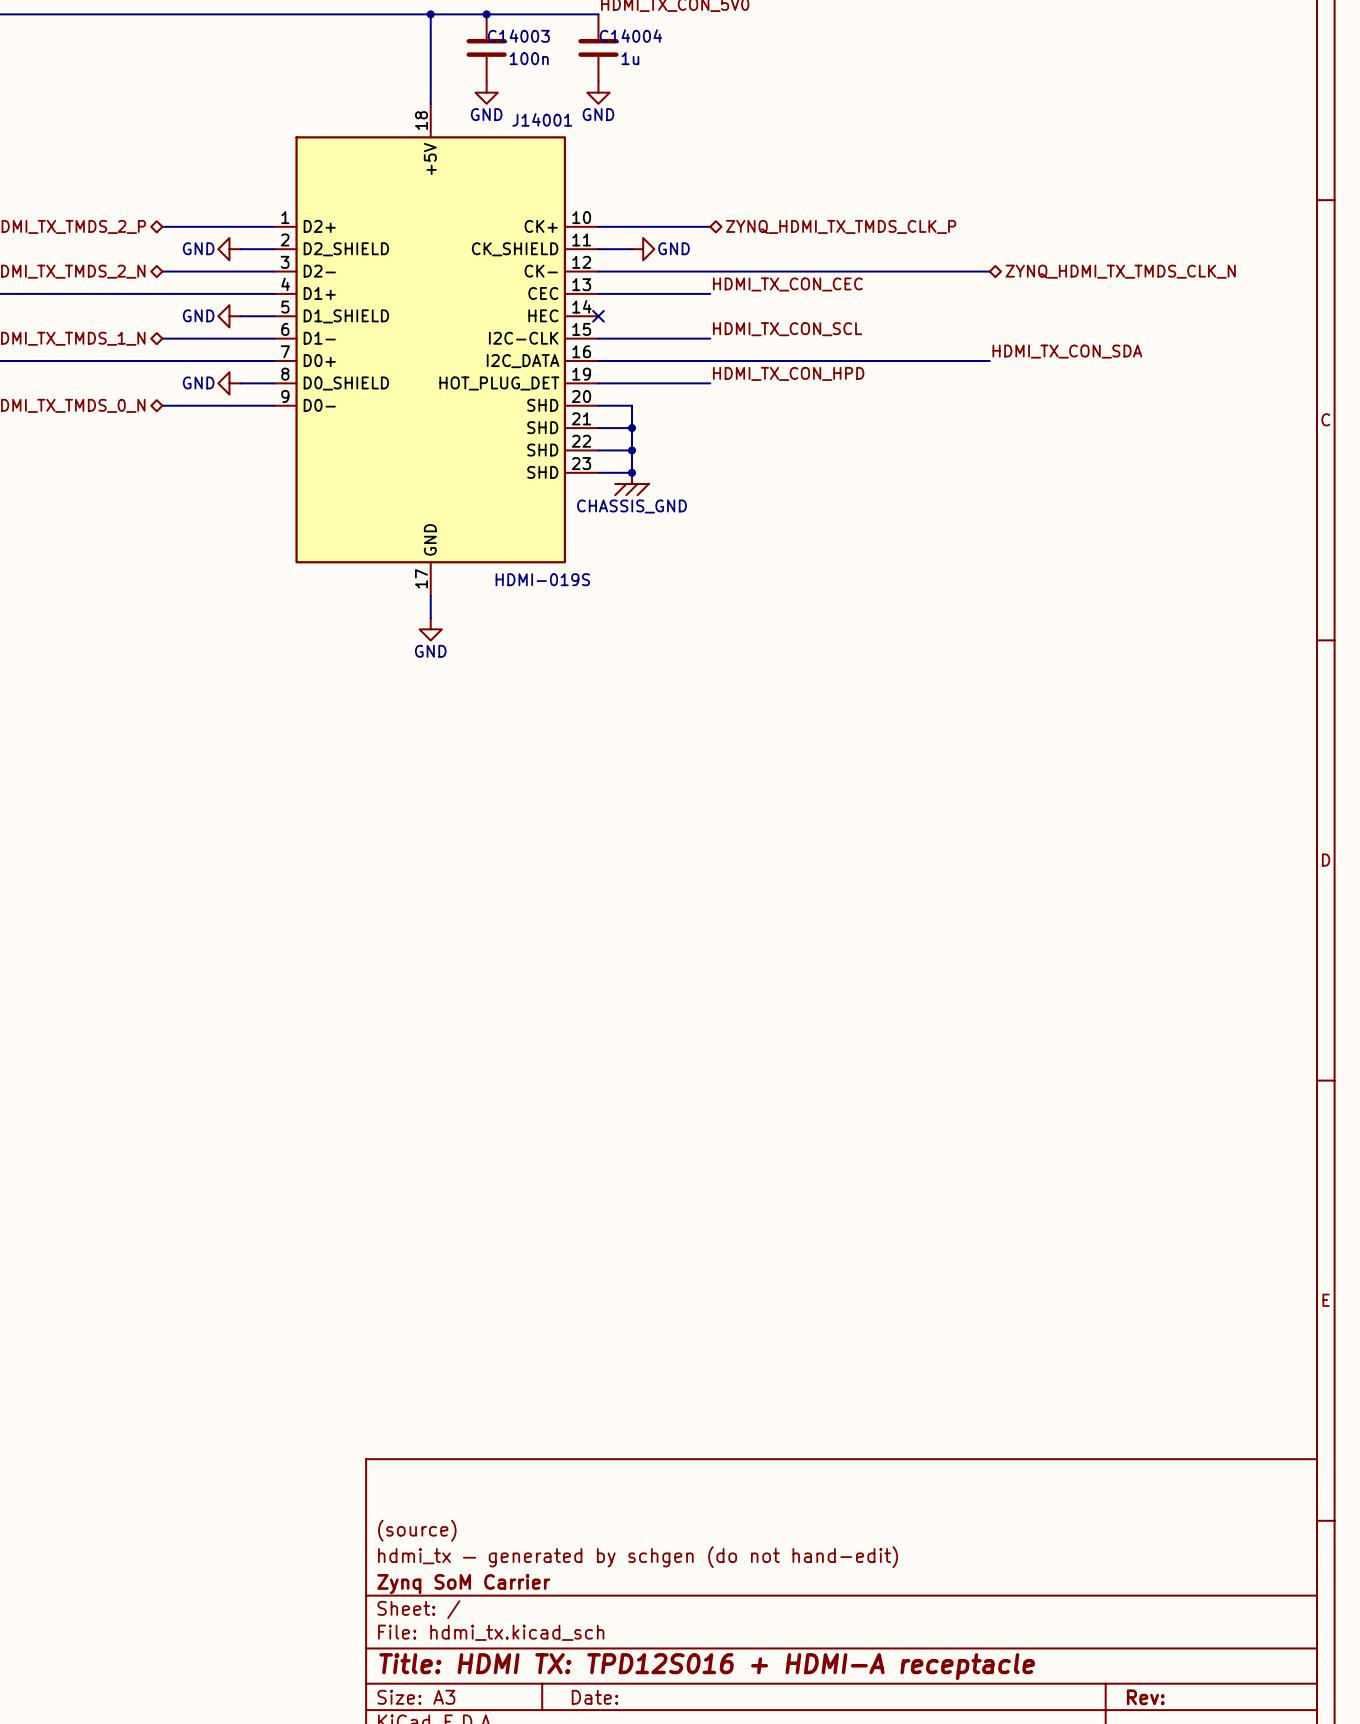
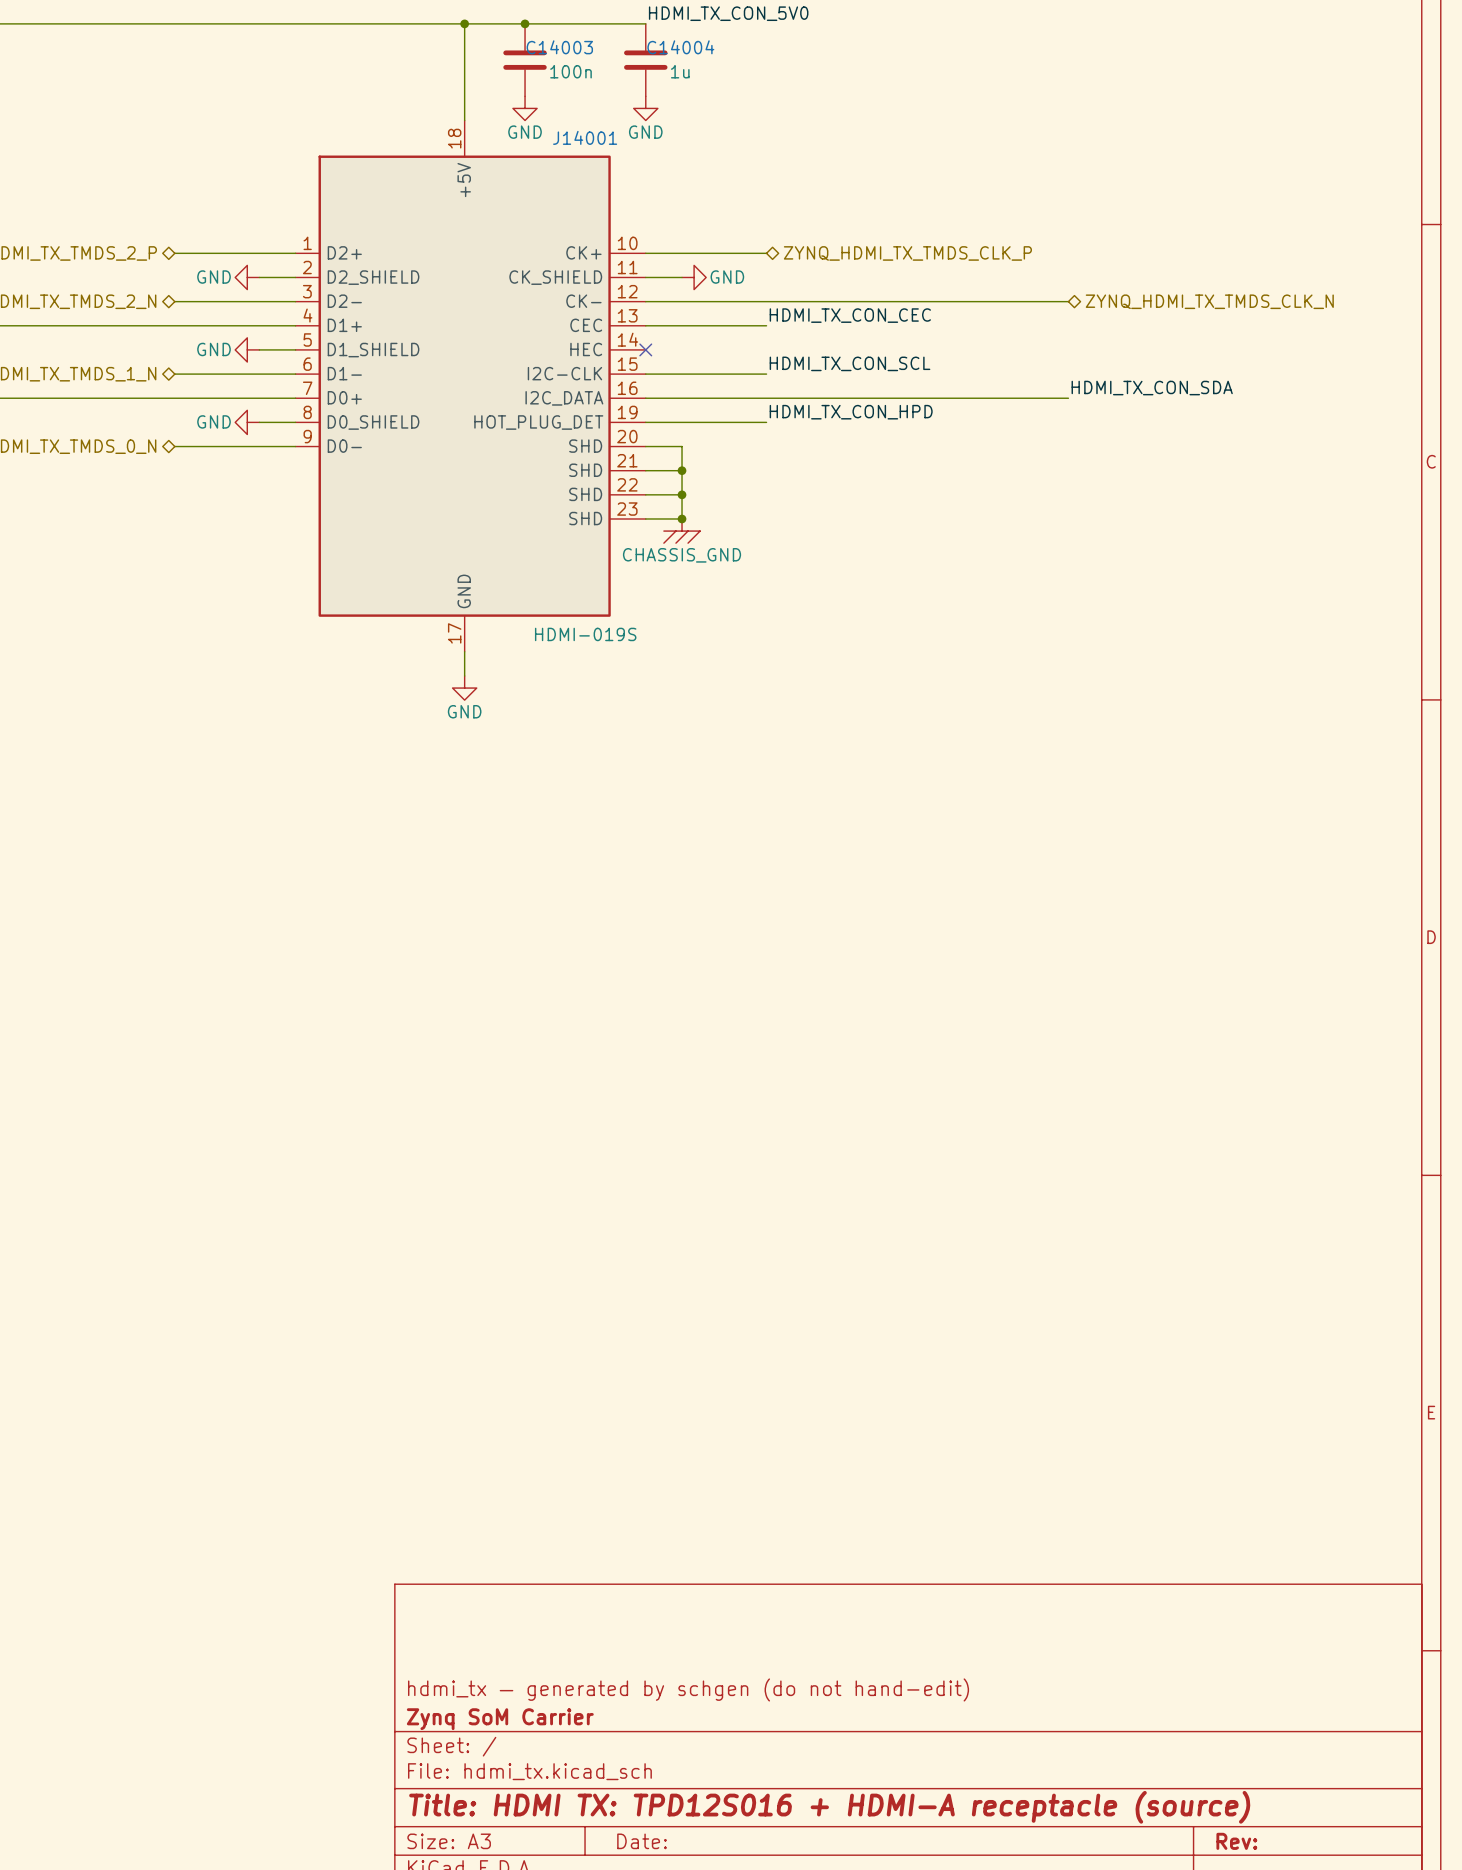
title block: (source) (417, 1530) -> none
title block: Title: HDMI TX: TPD12S016 + HDMI-A receptacle (707, 1666) -> Title: HDMI TX: TPD12S016 + HDMI-A receptacle (source) (829, 1807)

